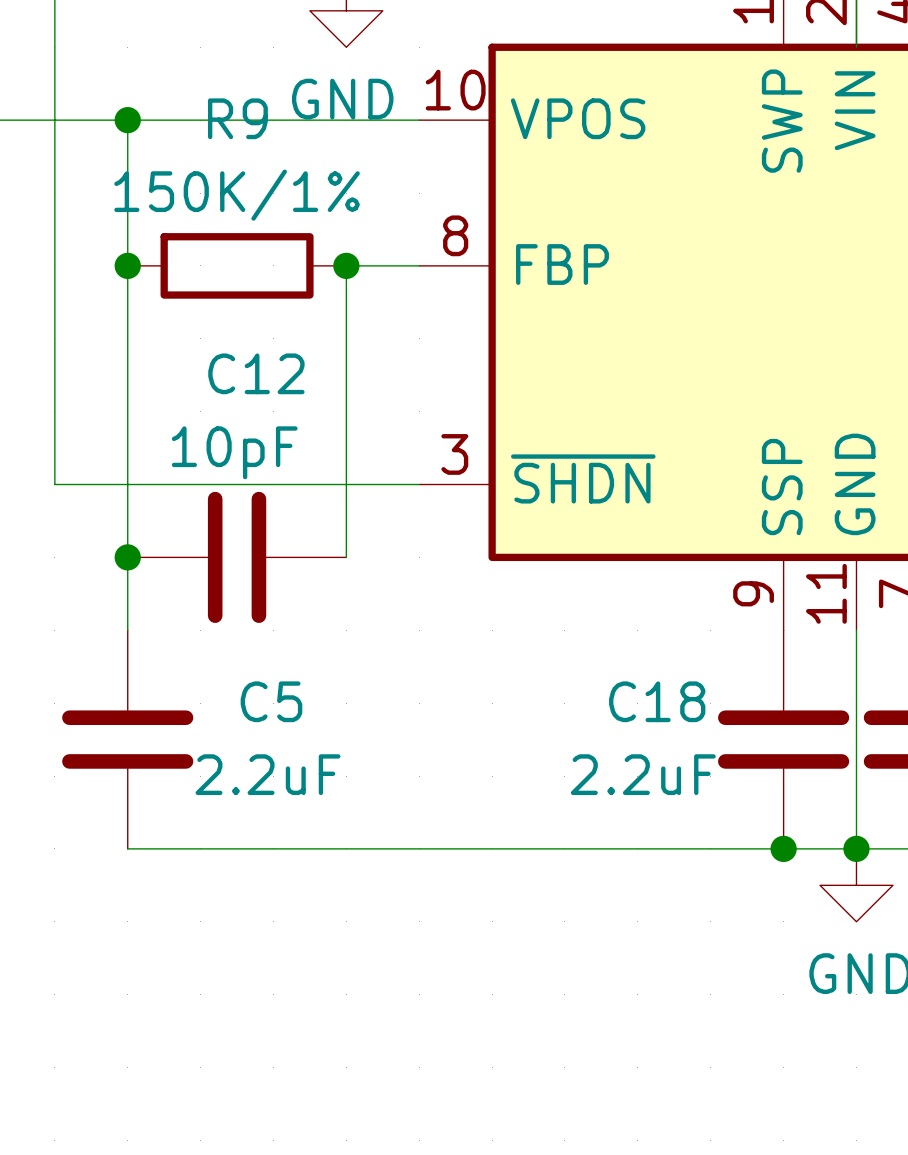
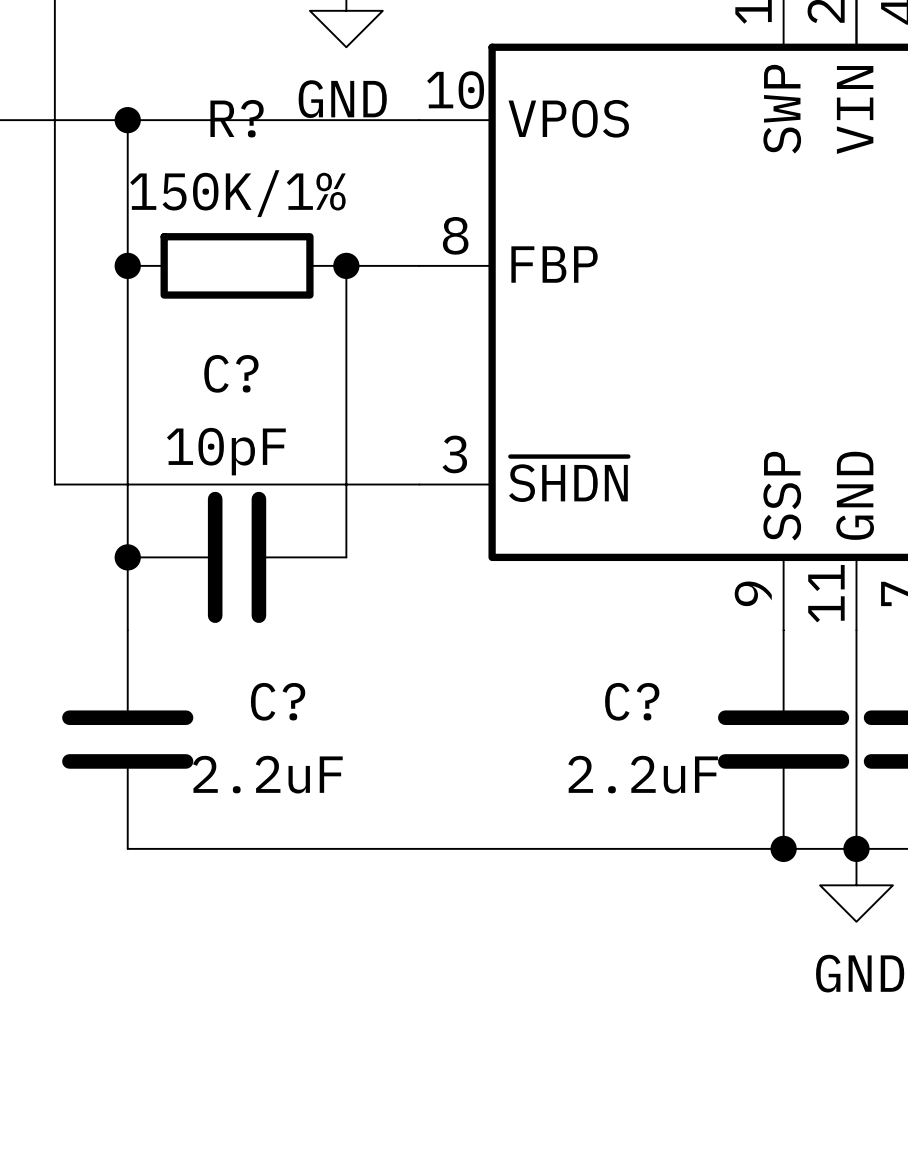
R9 name: R9 (237, 118) -> R? (237, 118)
C12 name: C12 (256, 373) -> C? (231, 373)
C5 name: C5 (271, 701) -> C? (278, 701)
C18 name: C18 (657, 701) -> C? (632, 701)

